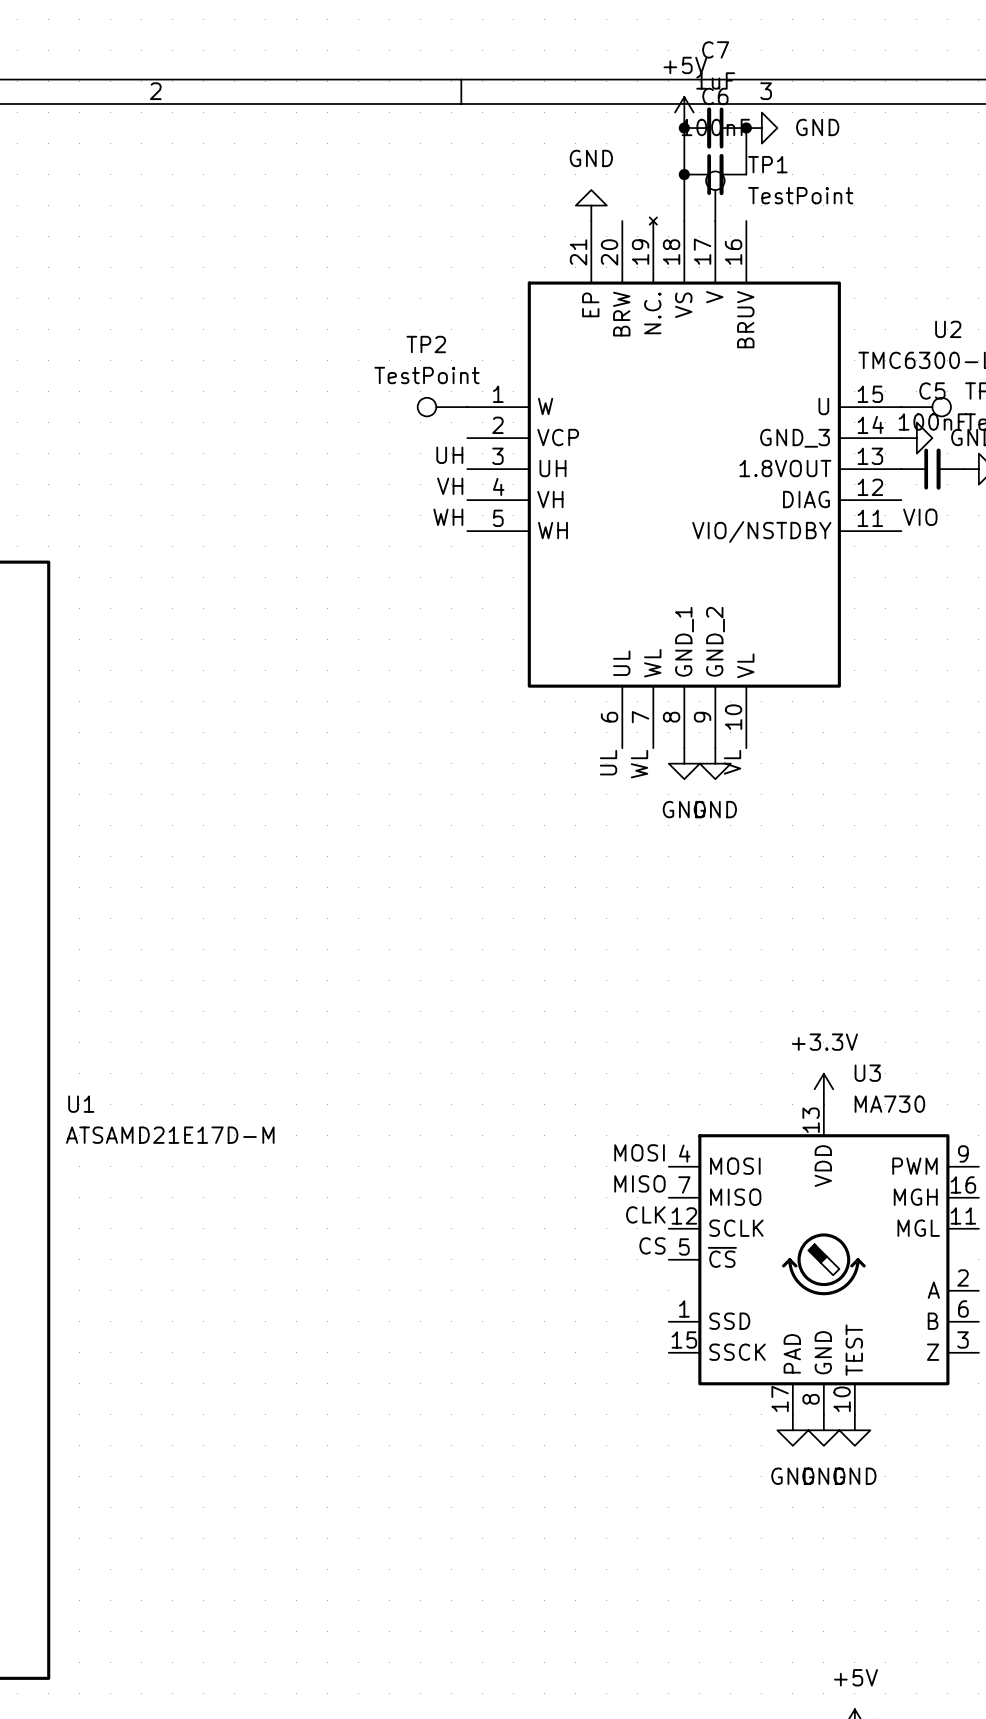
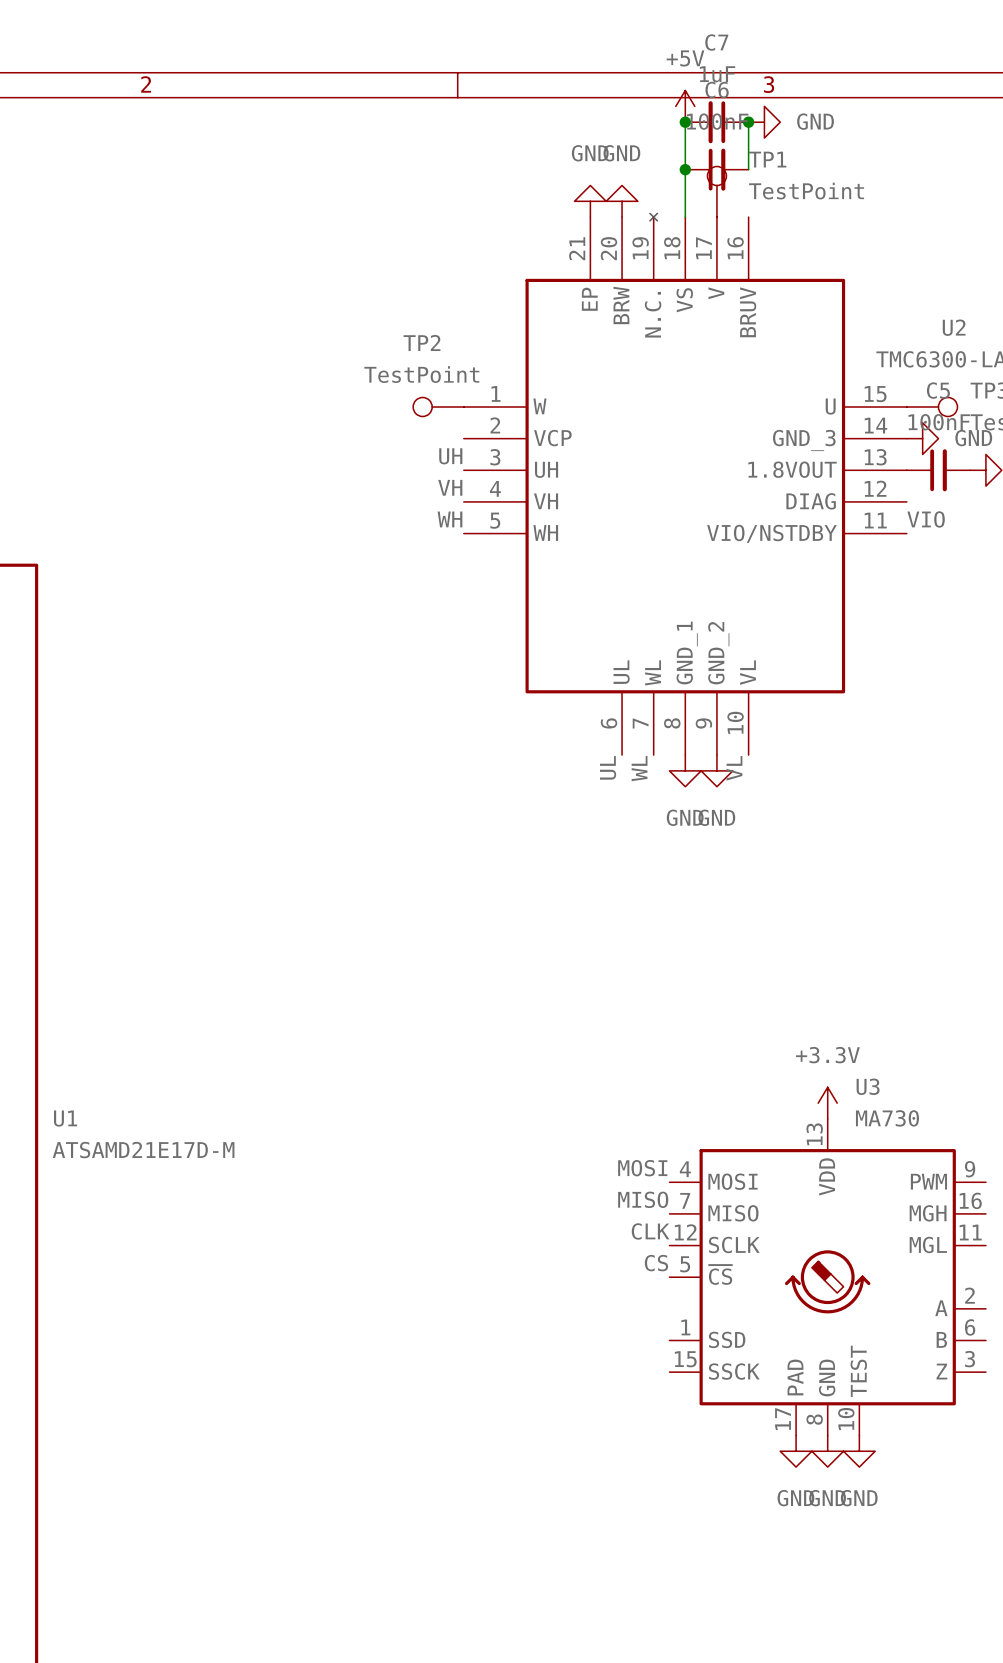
power symbol: none -> GND (622, 201)

